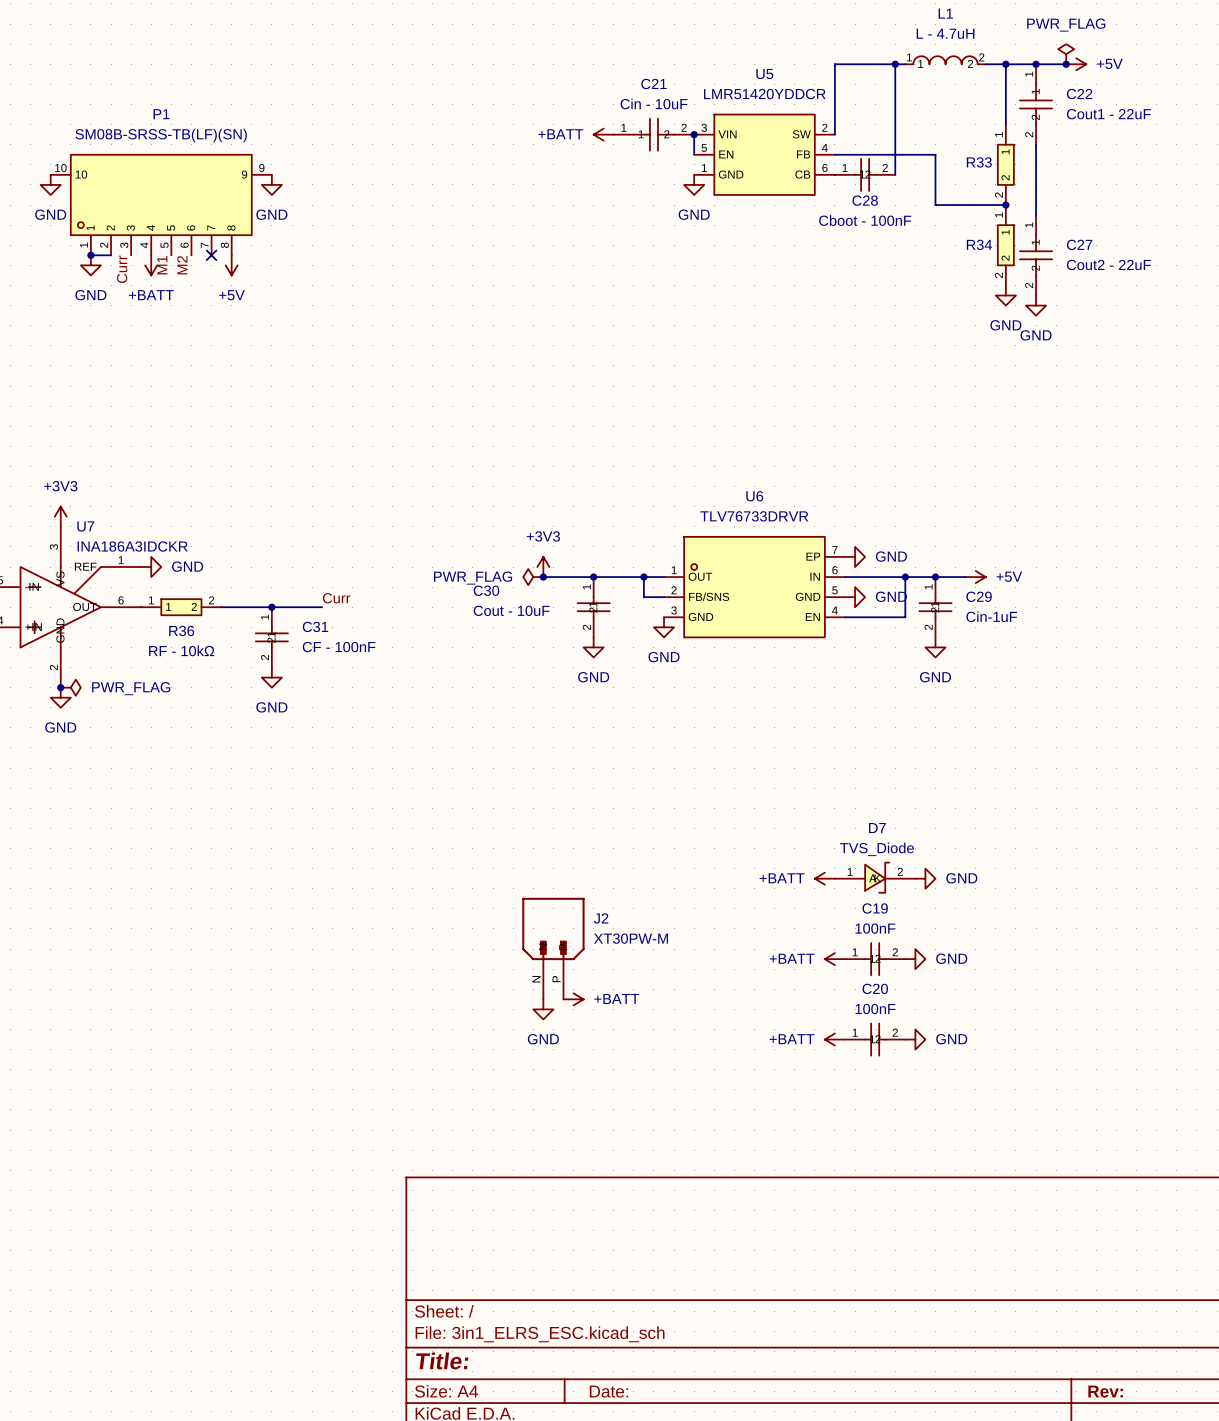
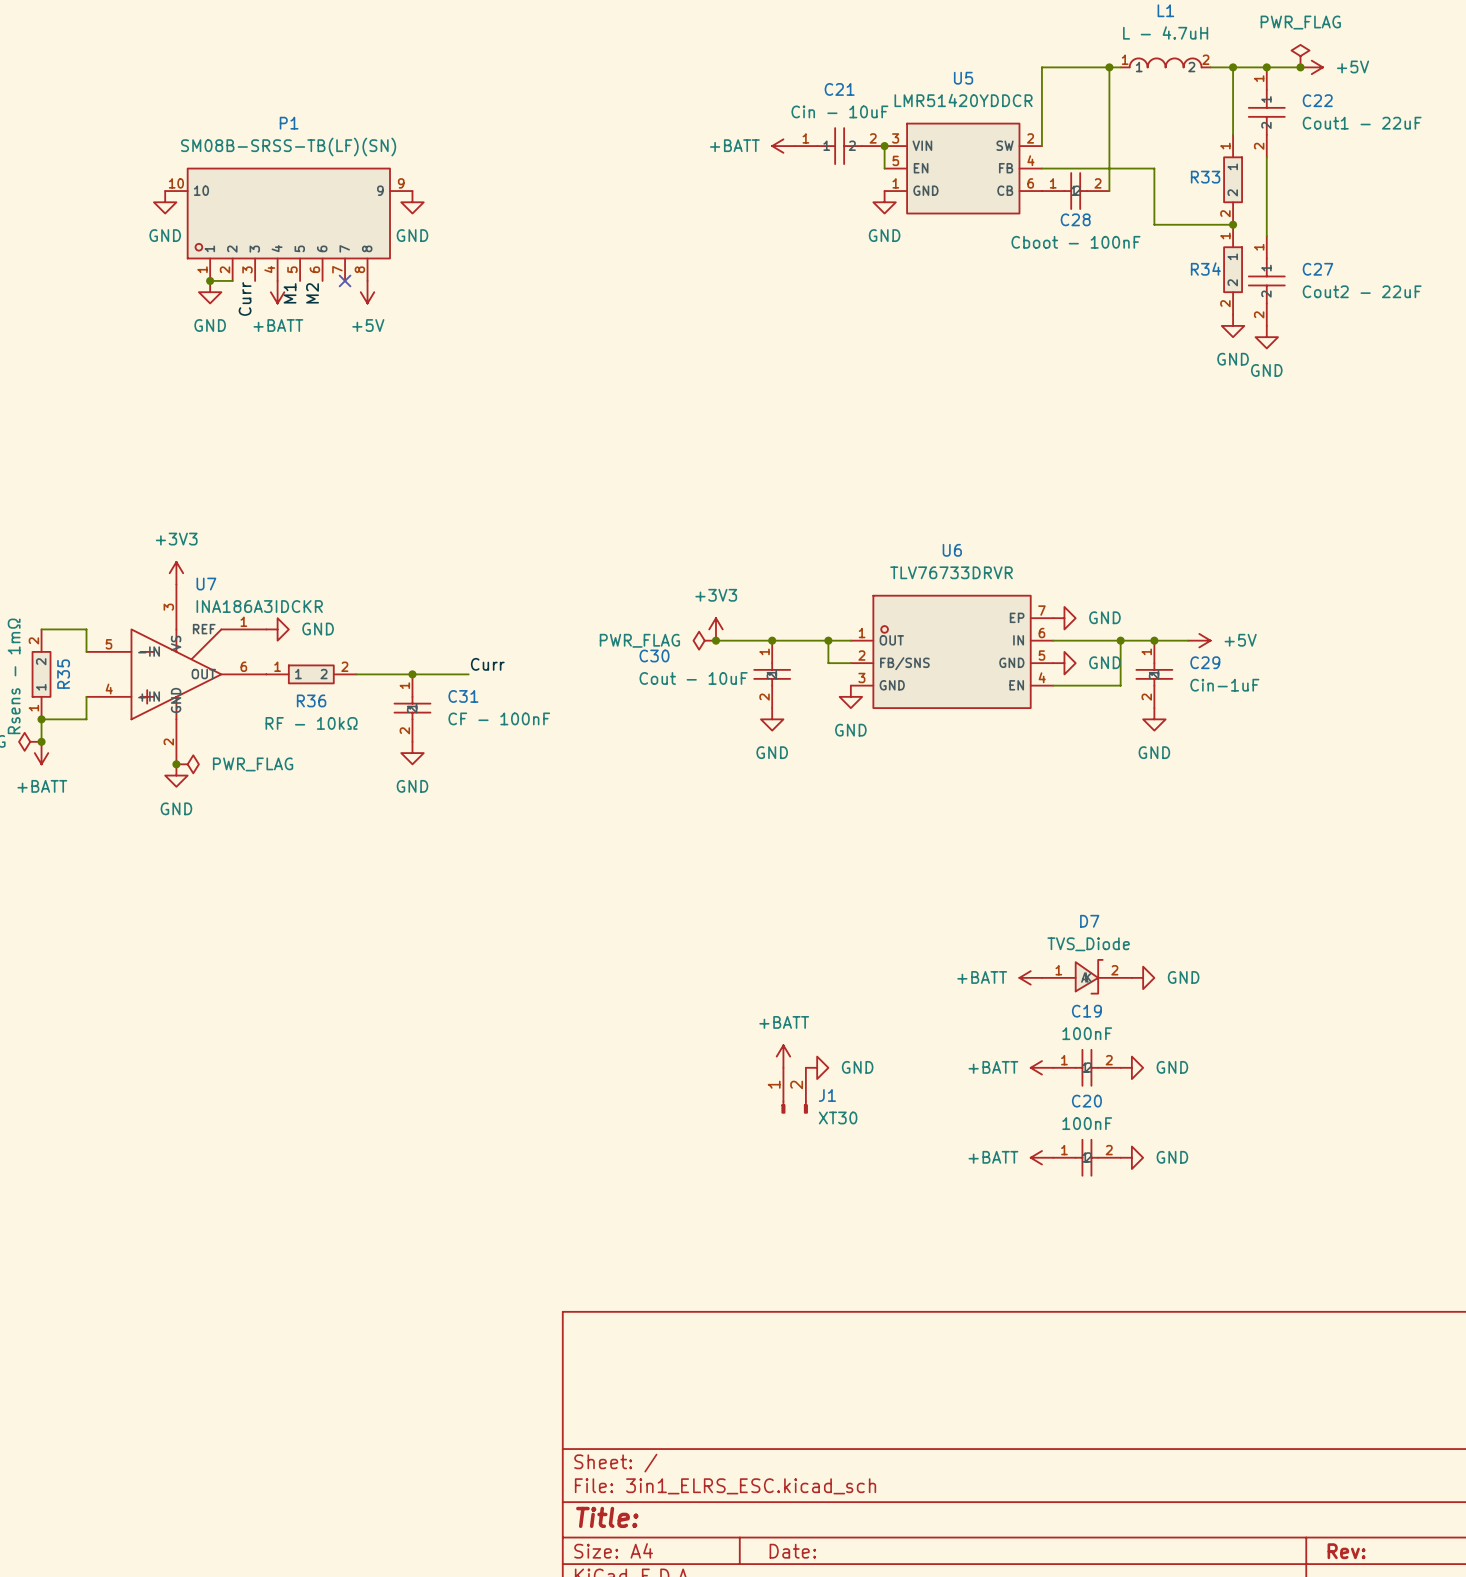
J2: XT30PW-M (553, 948) -> none
J1: none -> XT30 (794, 1090)
power symbol text position: +BATT (616, 998) -> +BATT (784, 1022)
power symbol rotation: 0° (573, 999) -> 90° counterclockwise (783, 1056)
power symbol position: +BATT (573, 999) -> +BATT (783, 1056)
power symbol rotation: 0° (543, 1009) -> 90° counterclockwise (817, 1067)
power symbol position: GND (543, 1009) -> GND (817, 1067)

